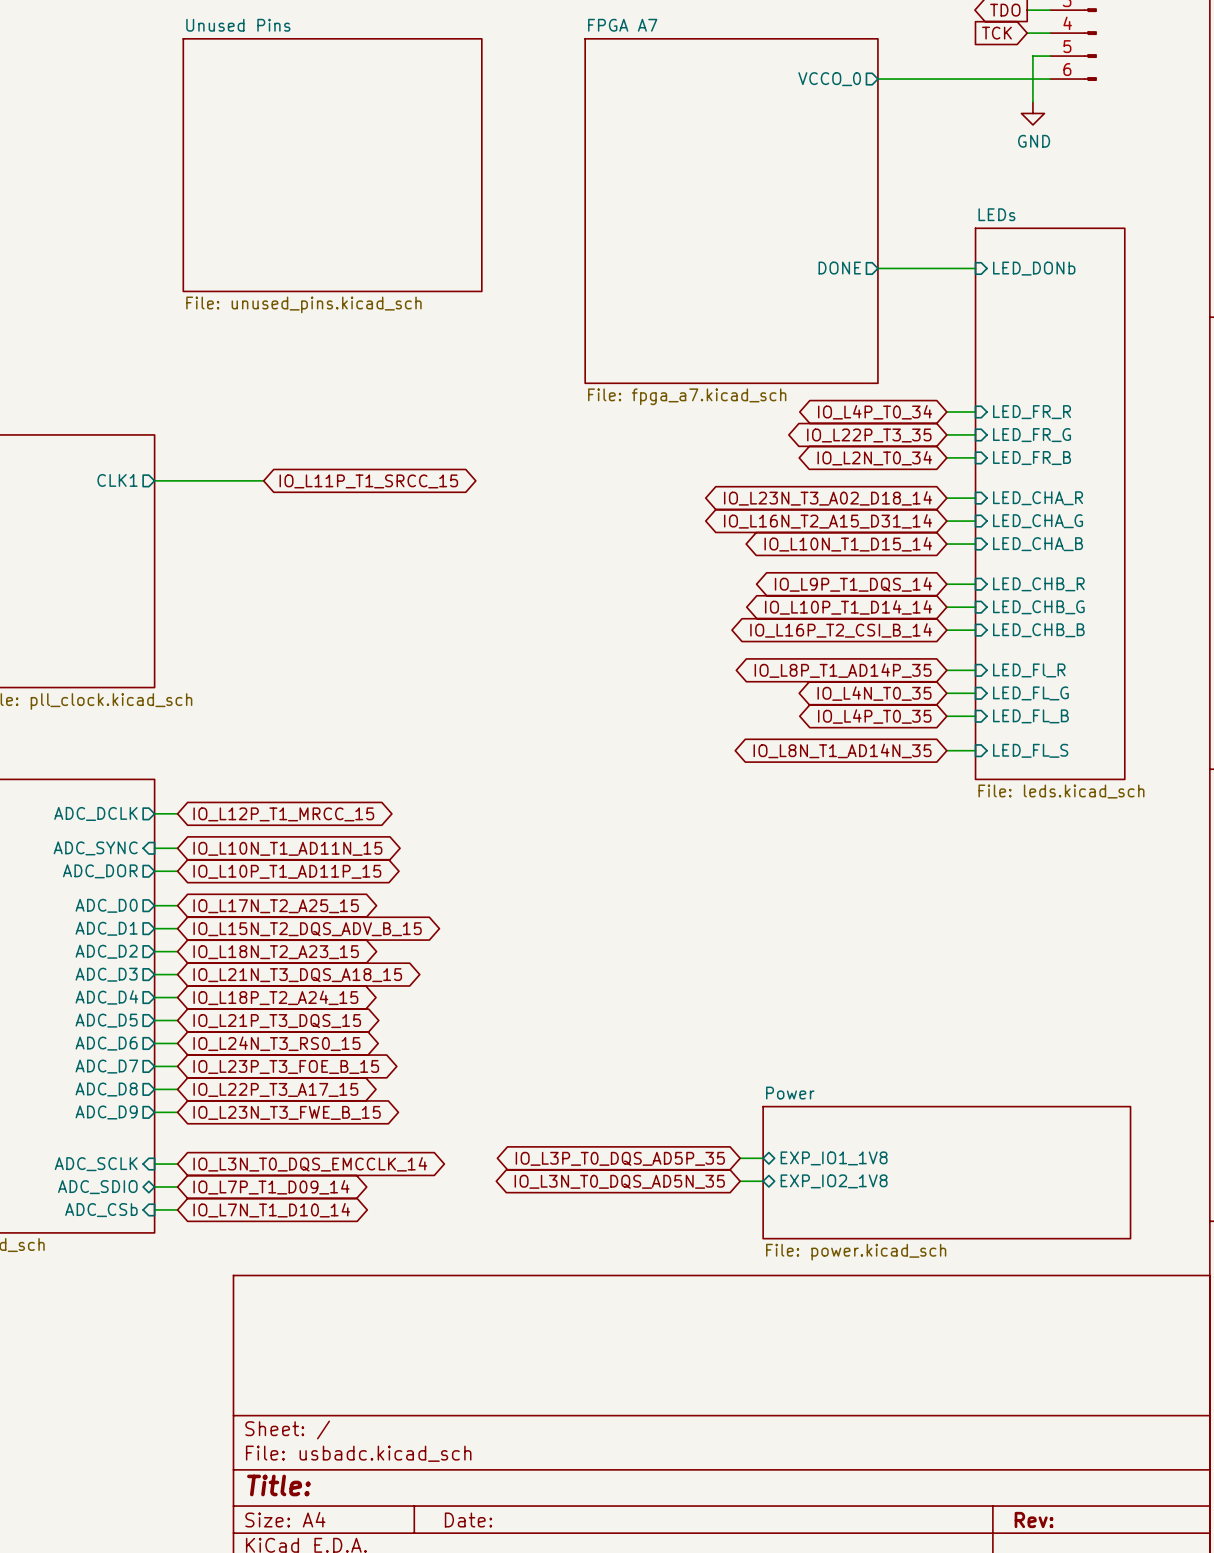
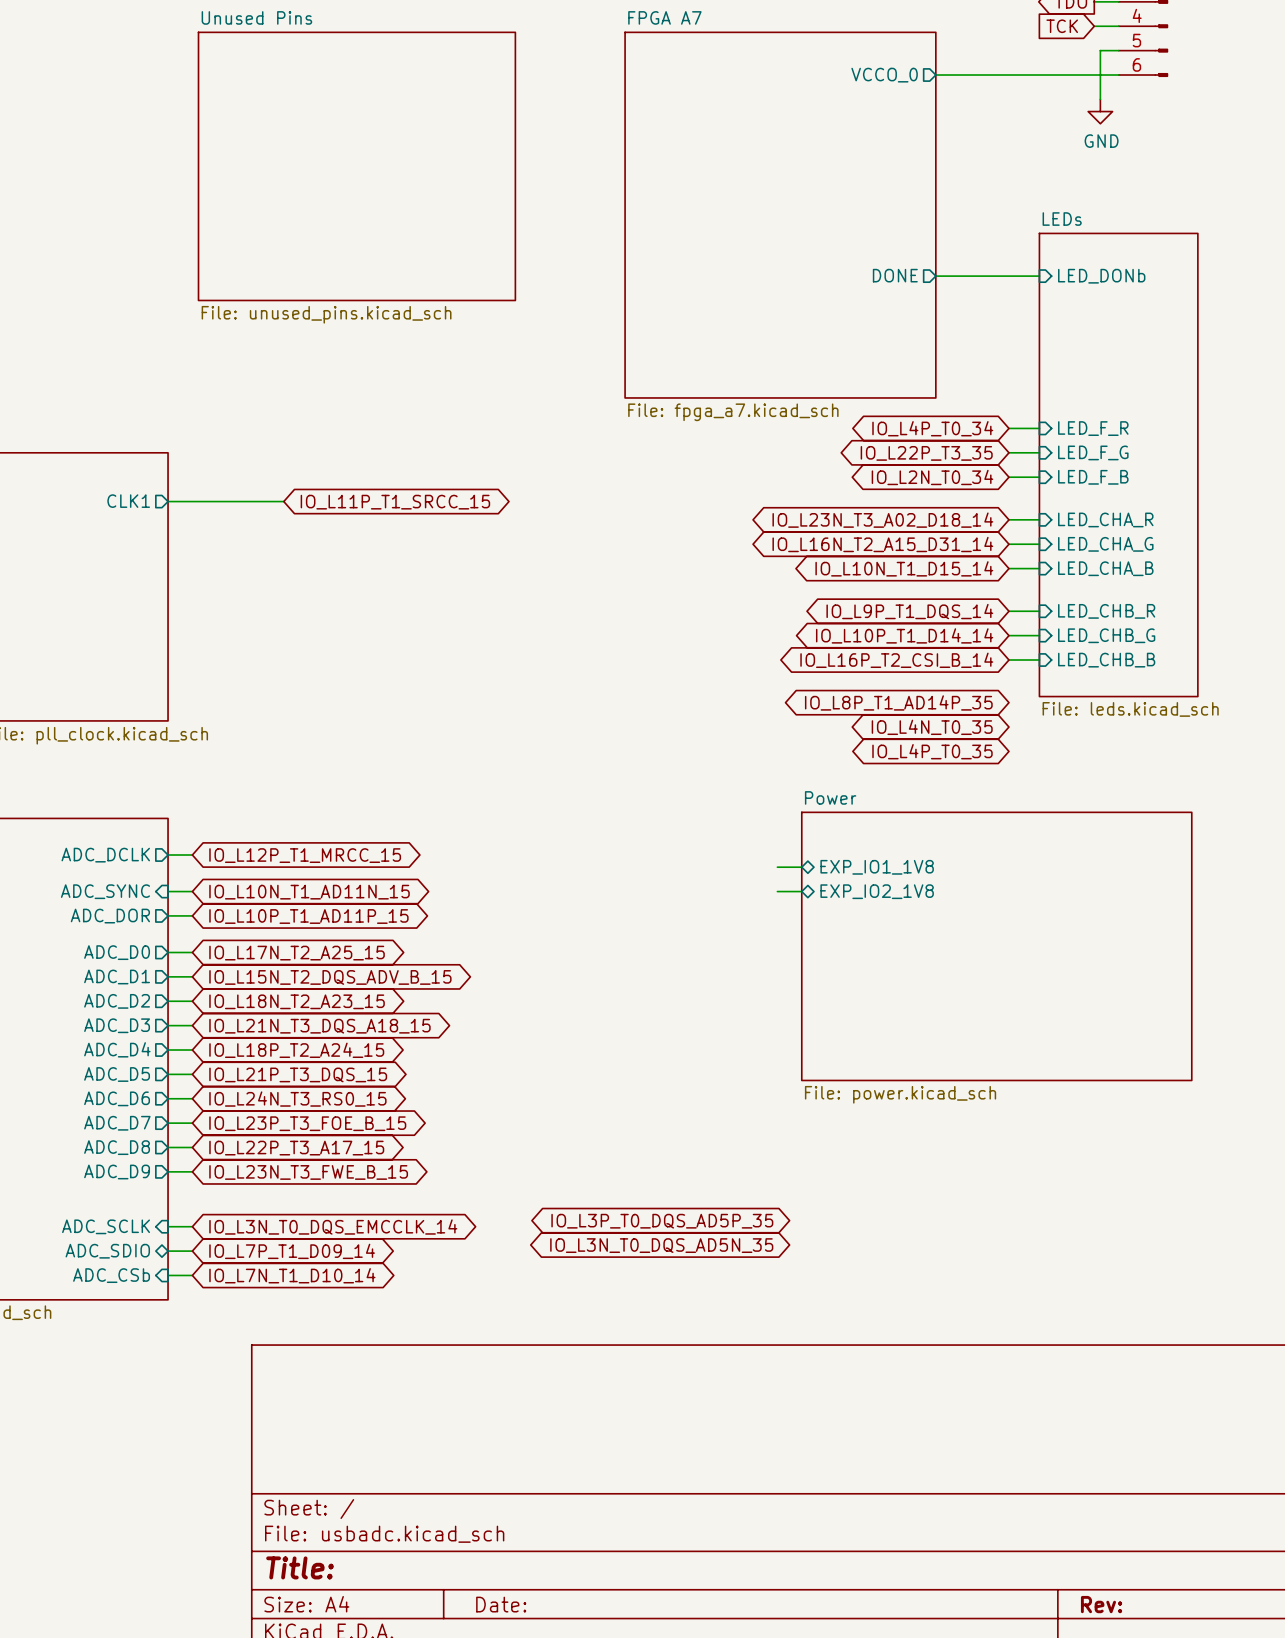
sheet pin: LED_FR_R (1032, 412) -> LED_F_R (1093, 428)
sheet pin: LED_FR_G (1032, 435) -> LED_F_G (1093, 452)
sheet LEDs: none -> File: leds.kicad_sch (1118, 465)
sheet pin: LED_FR_B (1032, 458) -> LED_F_B (1093, 477)
sheet LEDs: File: leds.kicad_sch (1050, 503) -> none
wire: (946, 670) (975, 670) -> none
sheet pin: LED_Fl_R (1029, 670) -> none
wire: (946, 693) (975, 693) -> none
sheet pin: LED_FL_G (1030, 693) -> none
wire: (946, 716) (975, 716) -> none
sheet pin: LED_FL_B (1030, 716) -> none
global label: IO_L8N_T1_AD14N_35 (842, 750) -> none
wire: (946, 750) (975, 750) -> none
sheet pin: LED_FL_S (1030, 750) -> none
wire: none -> (777, 867) (801, 867)
sheet pin: none -> EXP_IO1_1V8 (877, 867)
wire: none -> (777, 891) (801, 891)
sheet pin: none -> EXP_IO2_1V8 (877, 891)
sheet Power: none -> File: power.kicad_sch (996, 946)
wire: (740, 1158) (763, 1158) -> none
sheet pin: EXP_IO1_1V8 (834, 1158) -> none
sheet Power: File: power.kicad_sch (946, 1172) -> none
wire: (740, 1181) (763, 1181) -> none
sheet pin: EXP_IO2_1V8 (834, 1181) -> none

